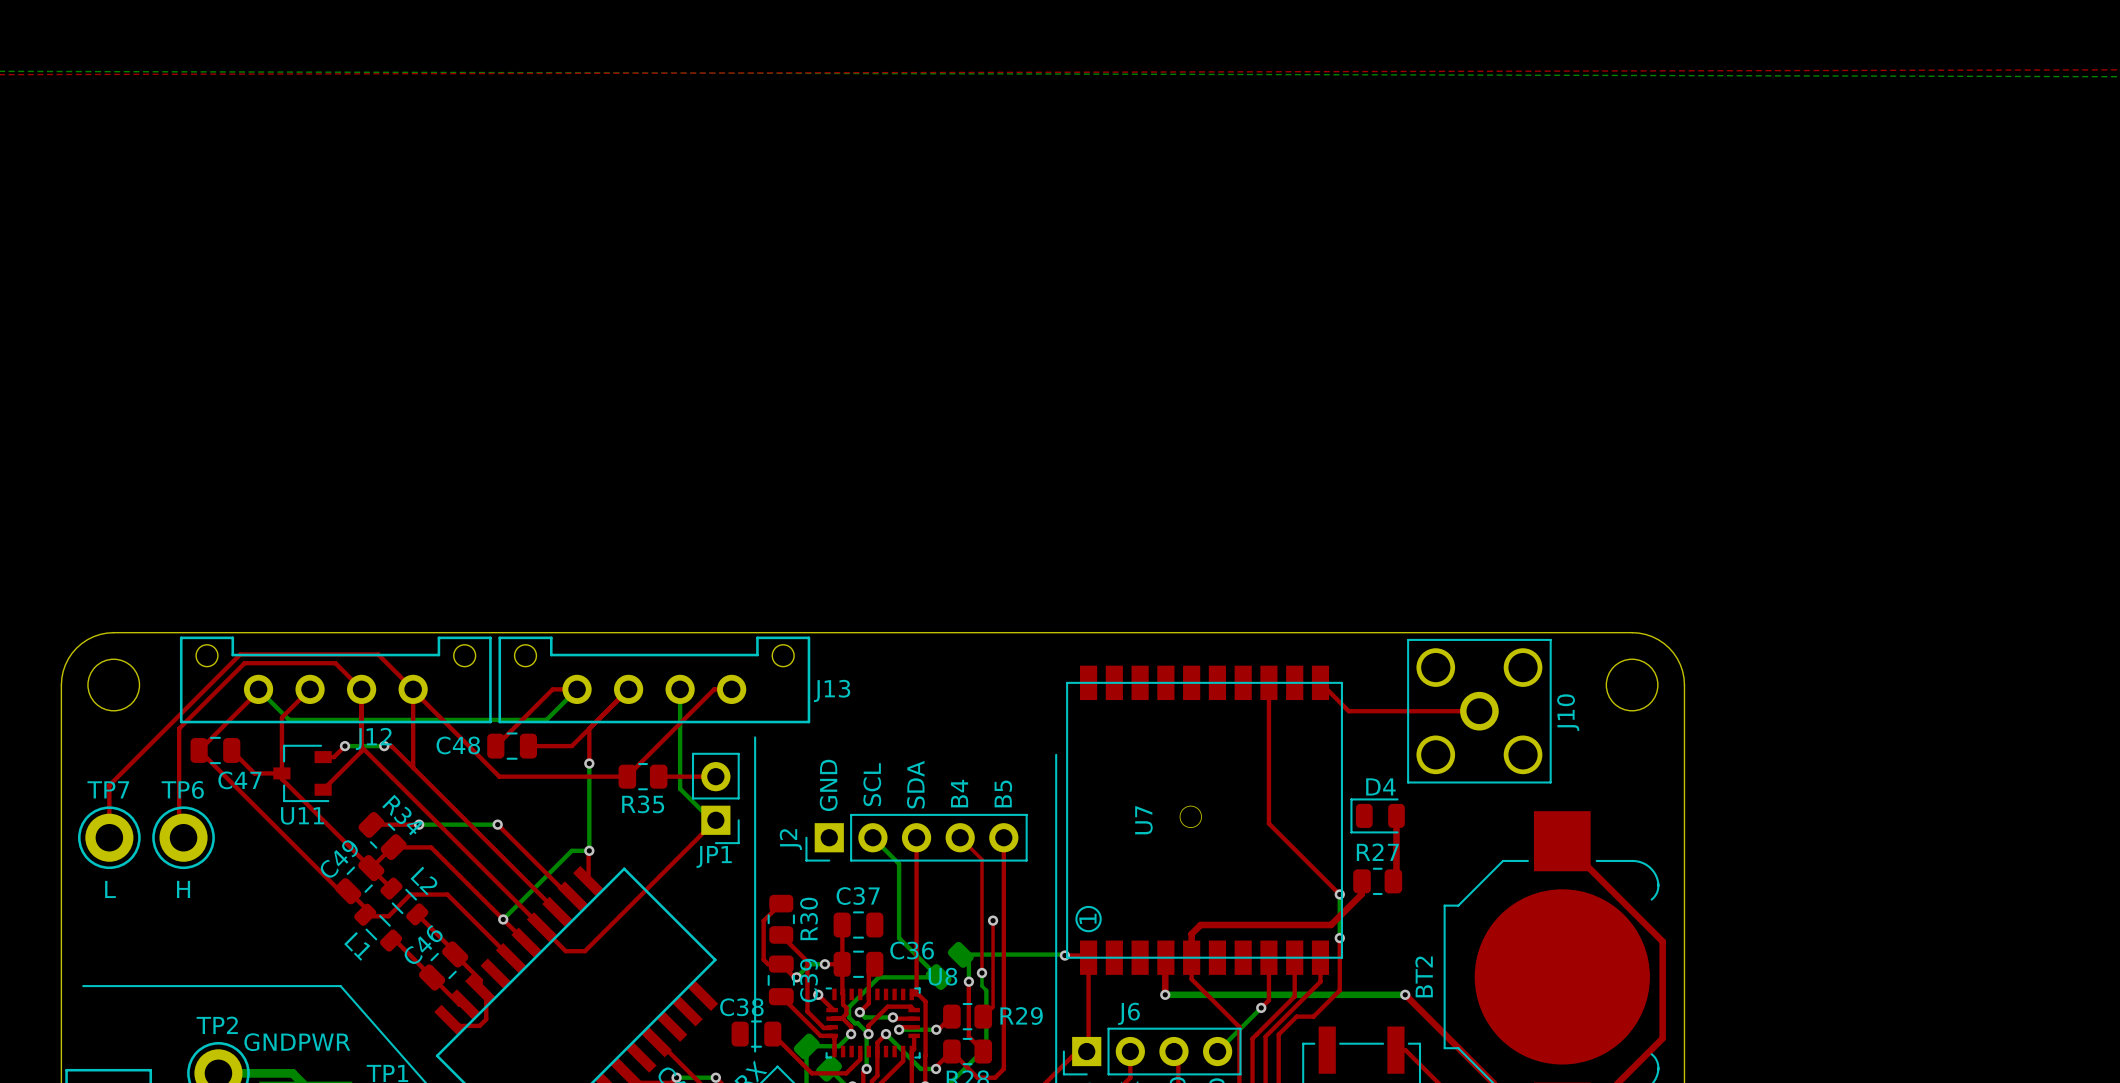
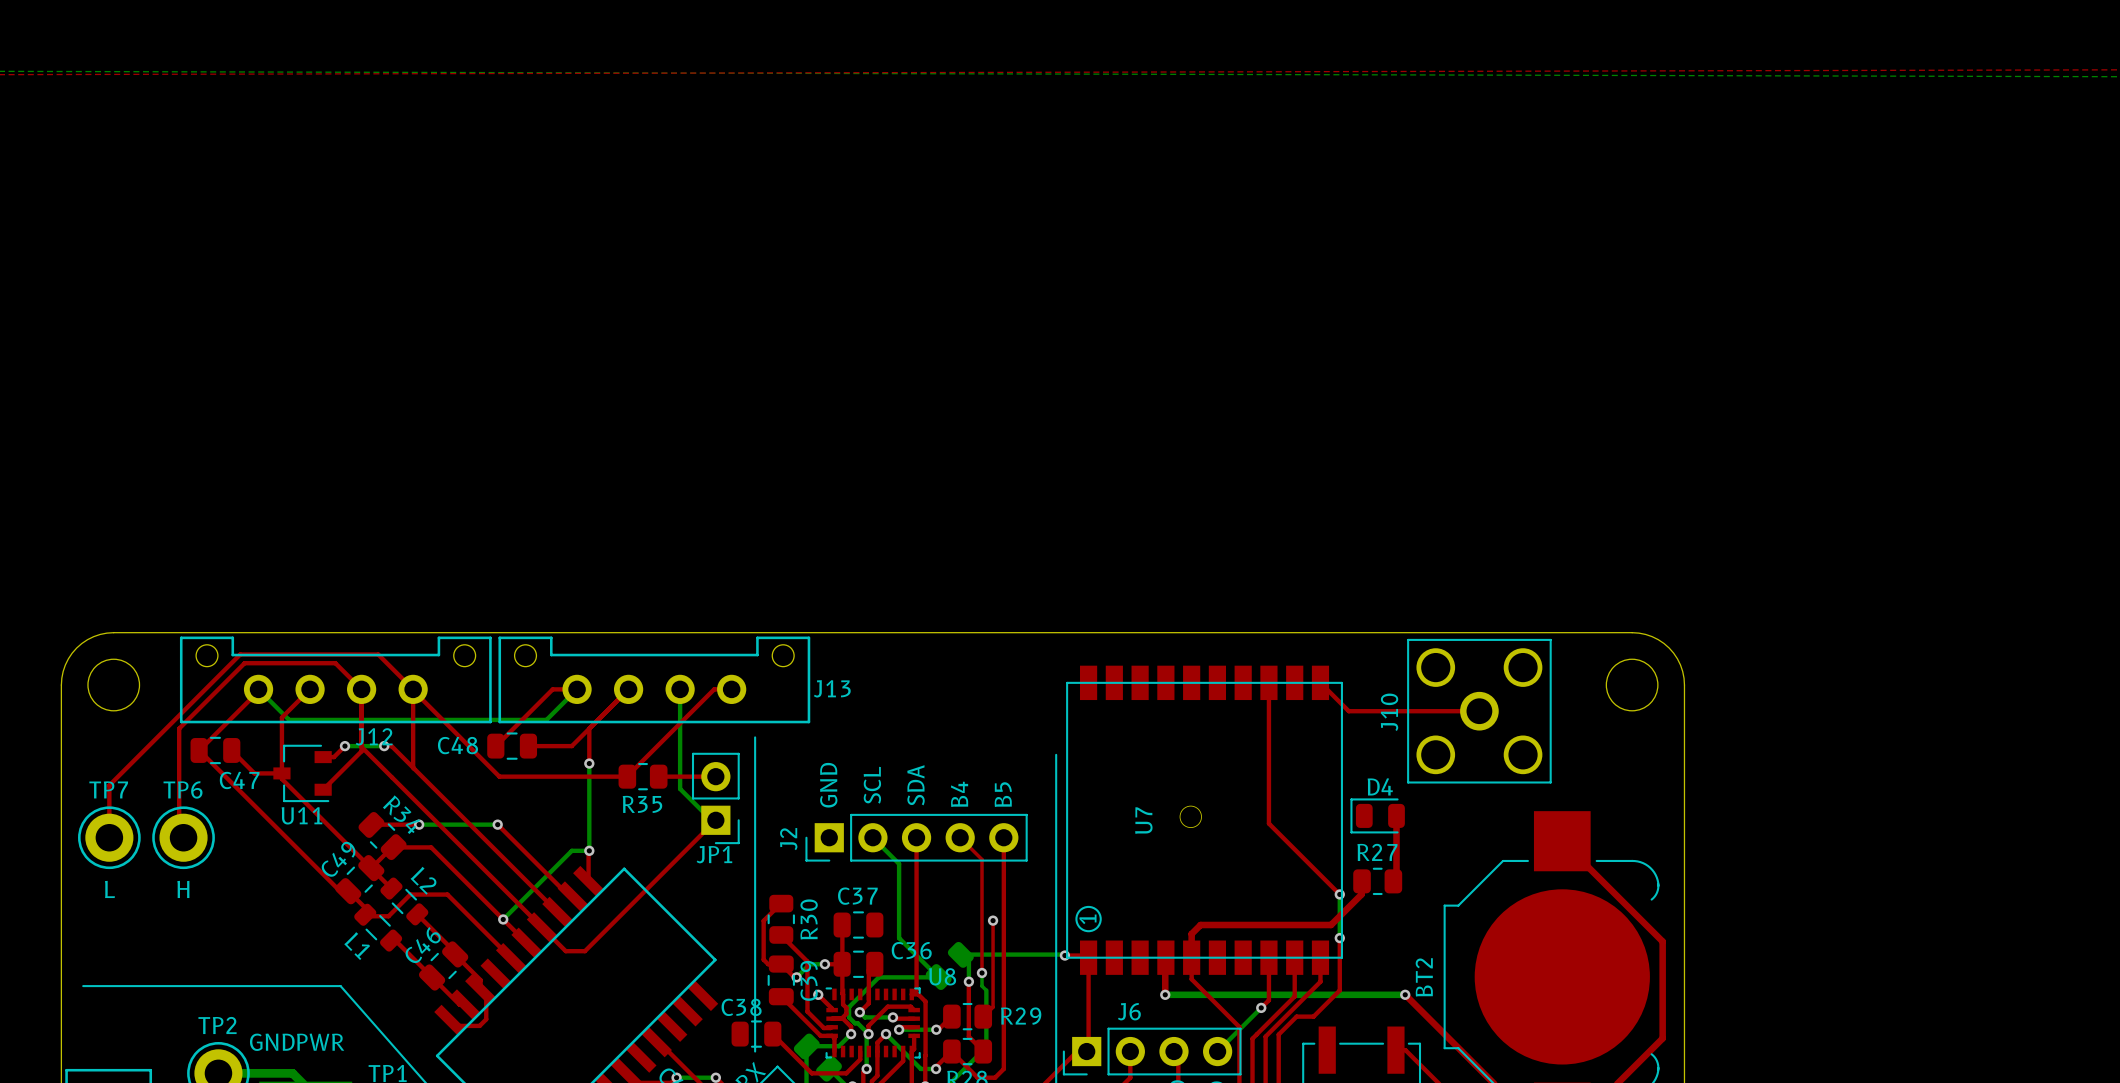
J10 name position: J10 (1568, 712) -> J10 (1389, 712)

